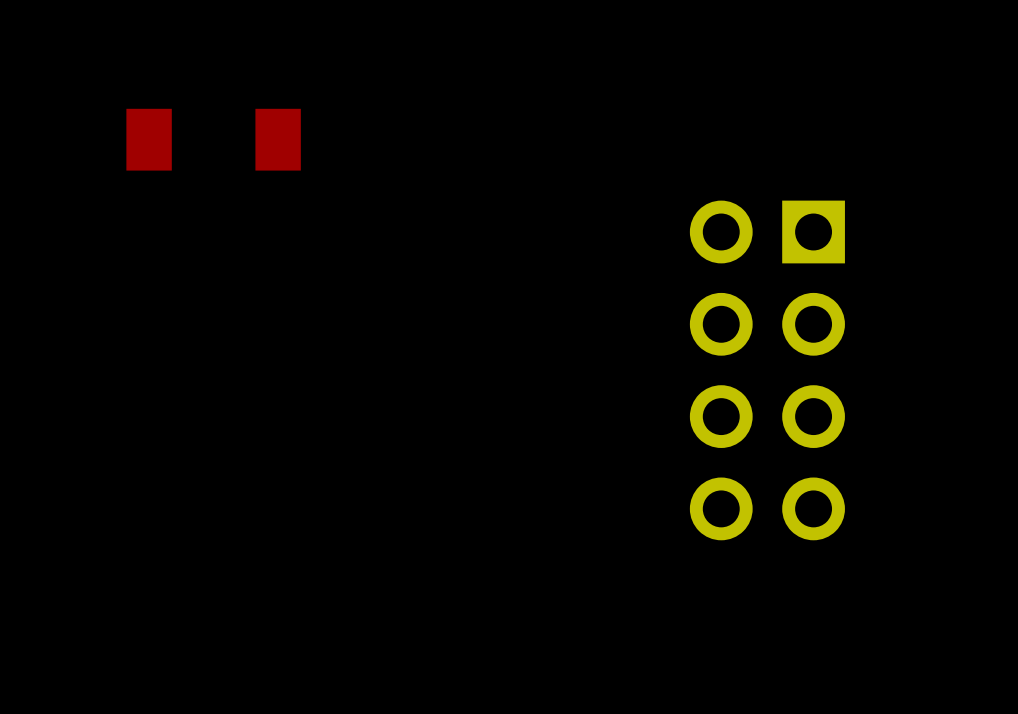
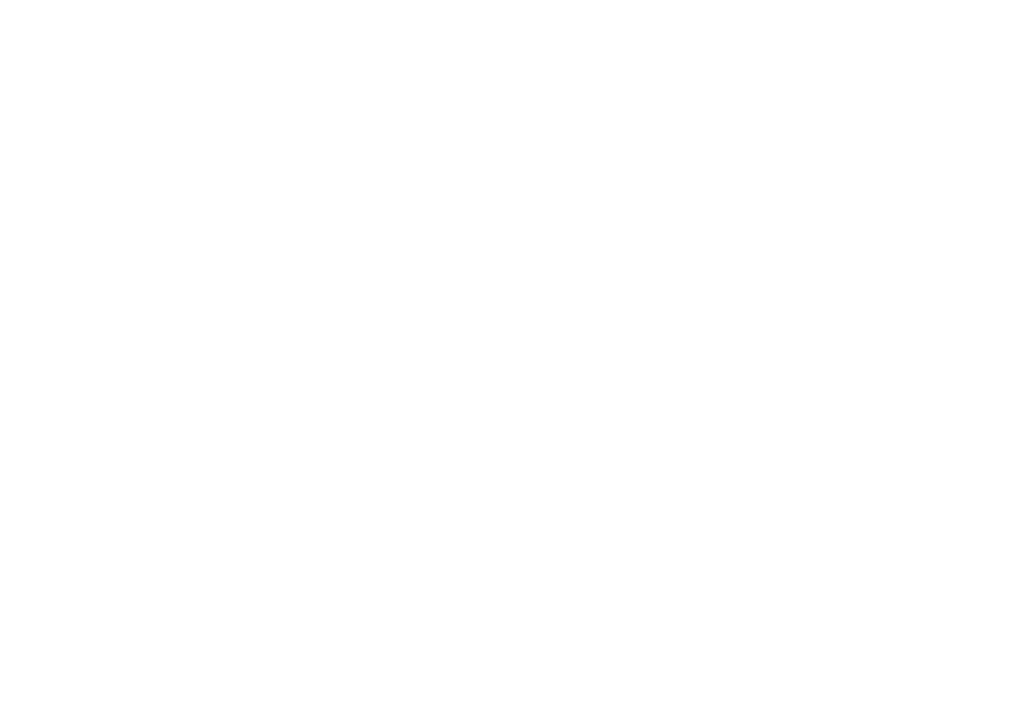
part: (213, 139) -> none
part: (767, 370) -> none

